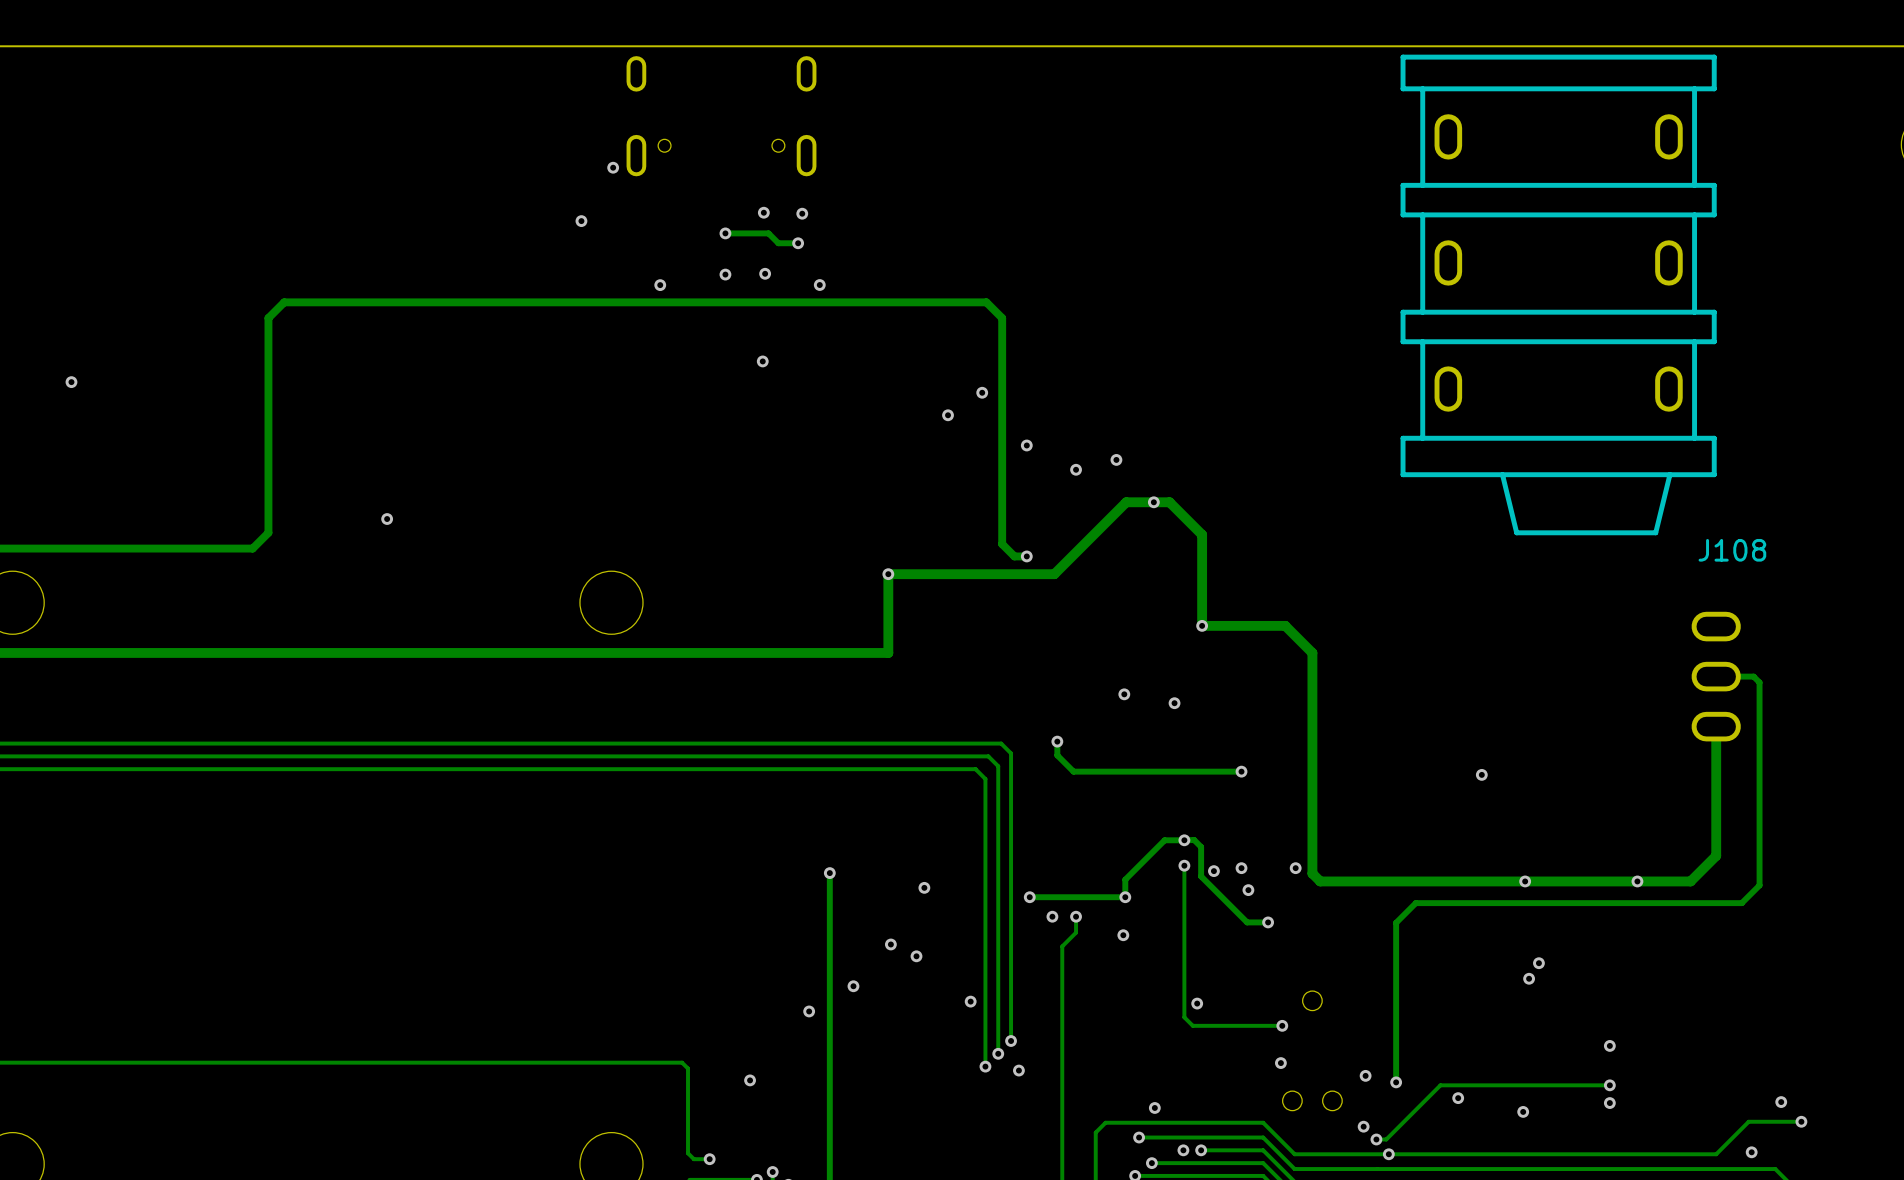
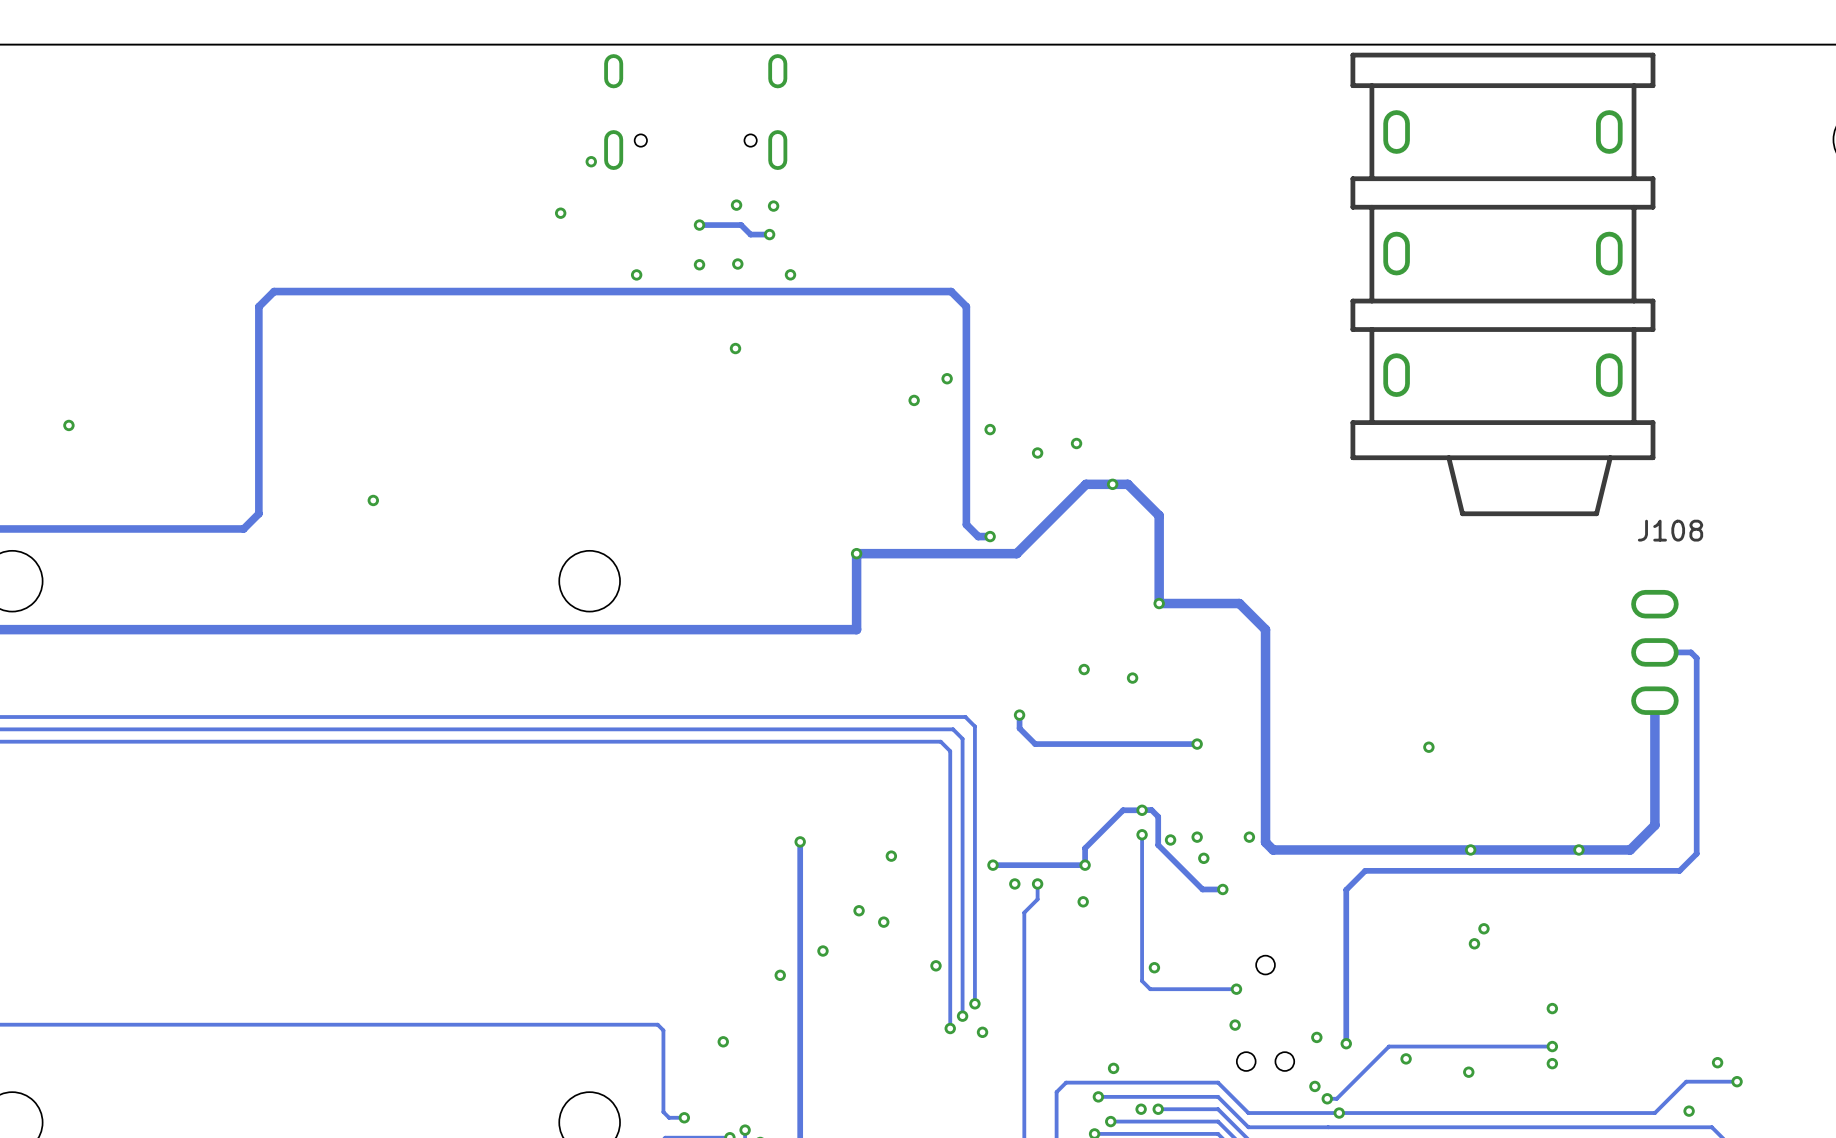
via position: (71, 382) -> (68, 425)

